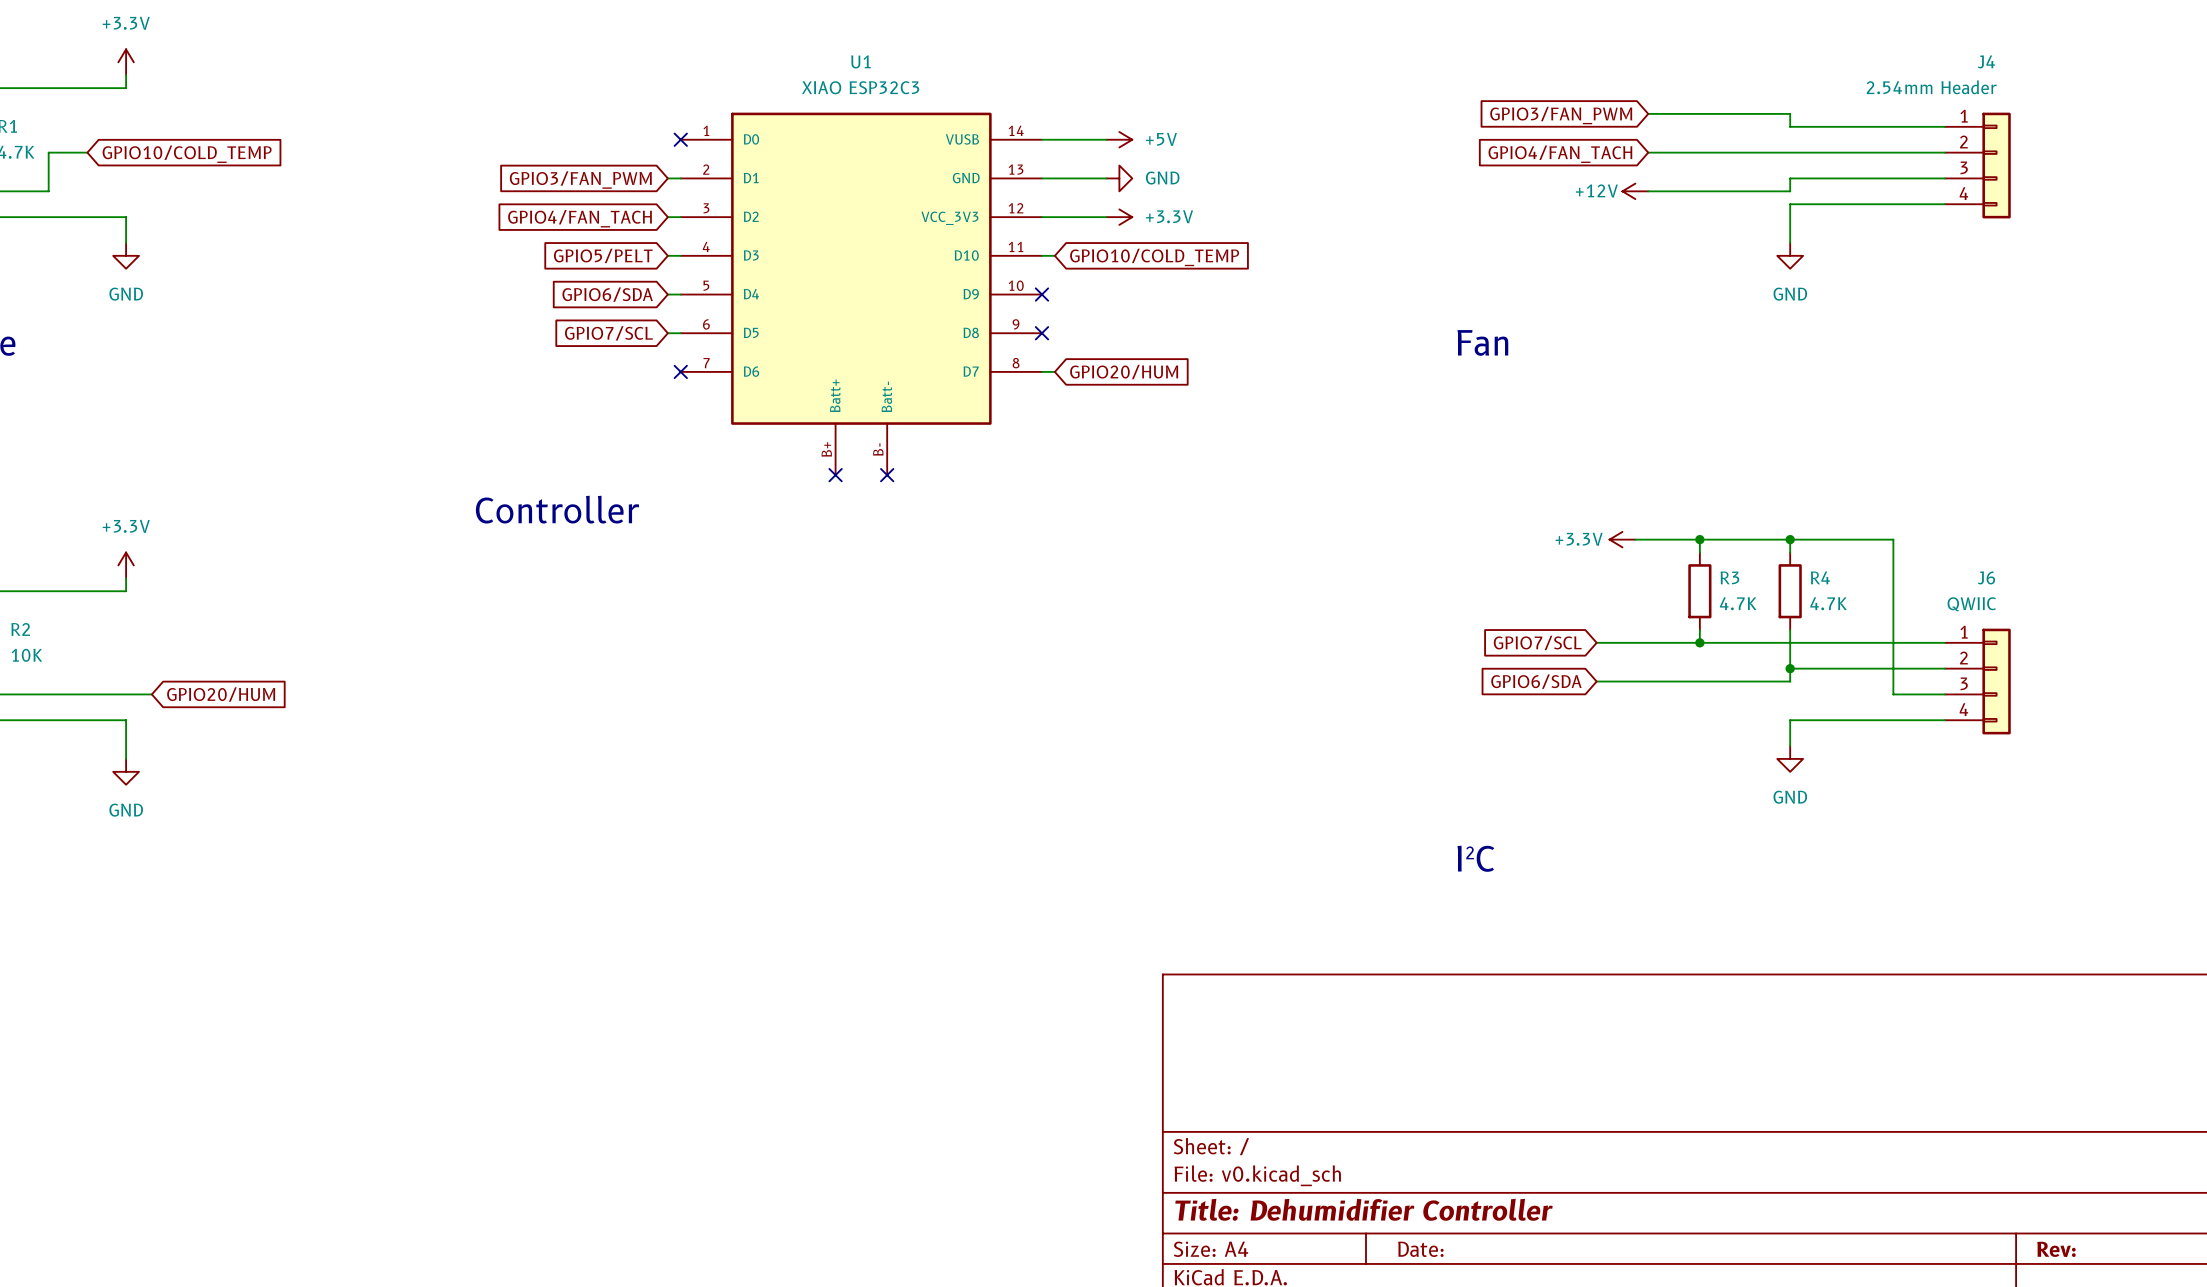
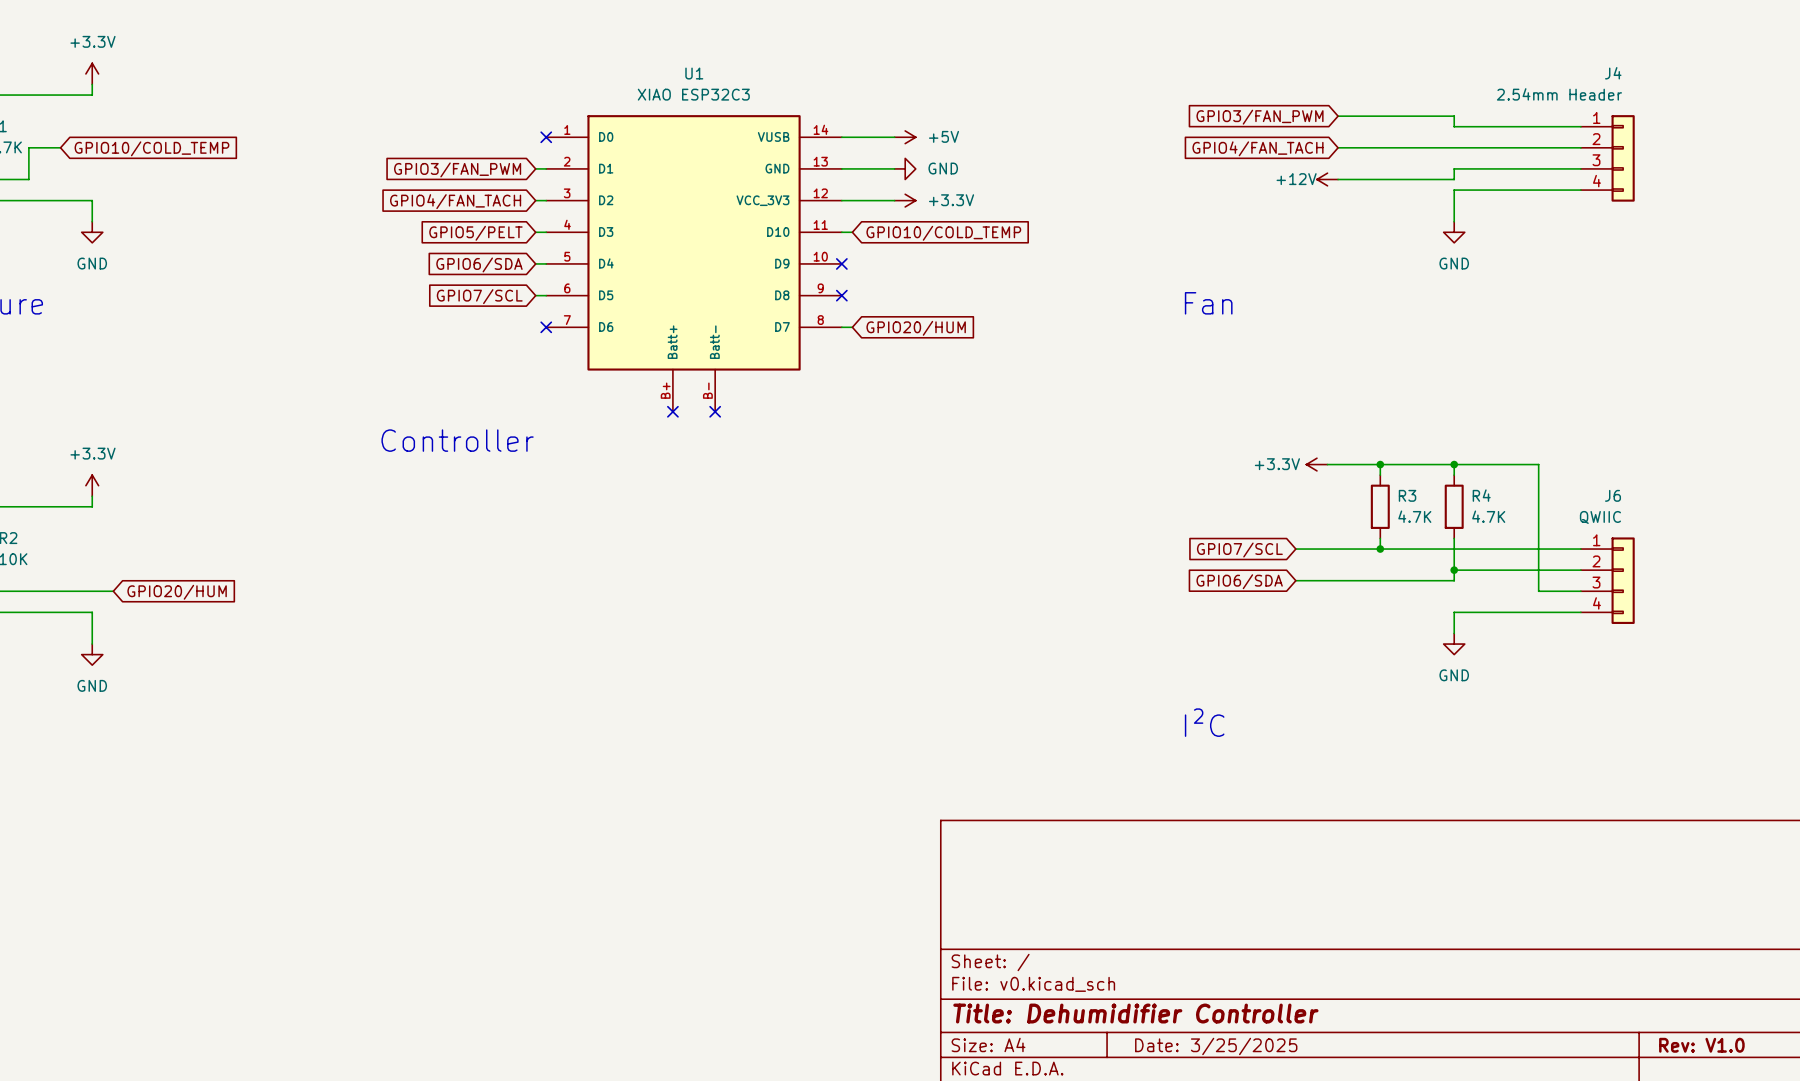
title block: Date: (1420, 1249) -> Date: 3/25/2025 (1216, 1046)
title block: Rev: (2056, 1249) -> Rev: V1.0 (1701, 1045)

